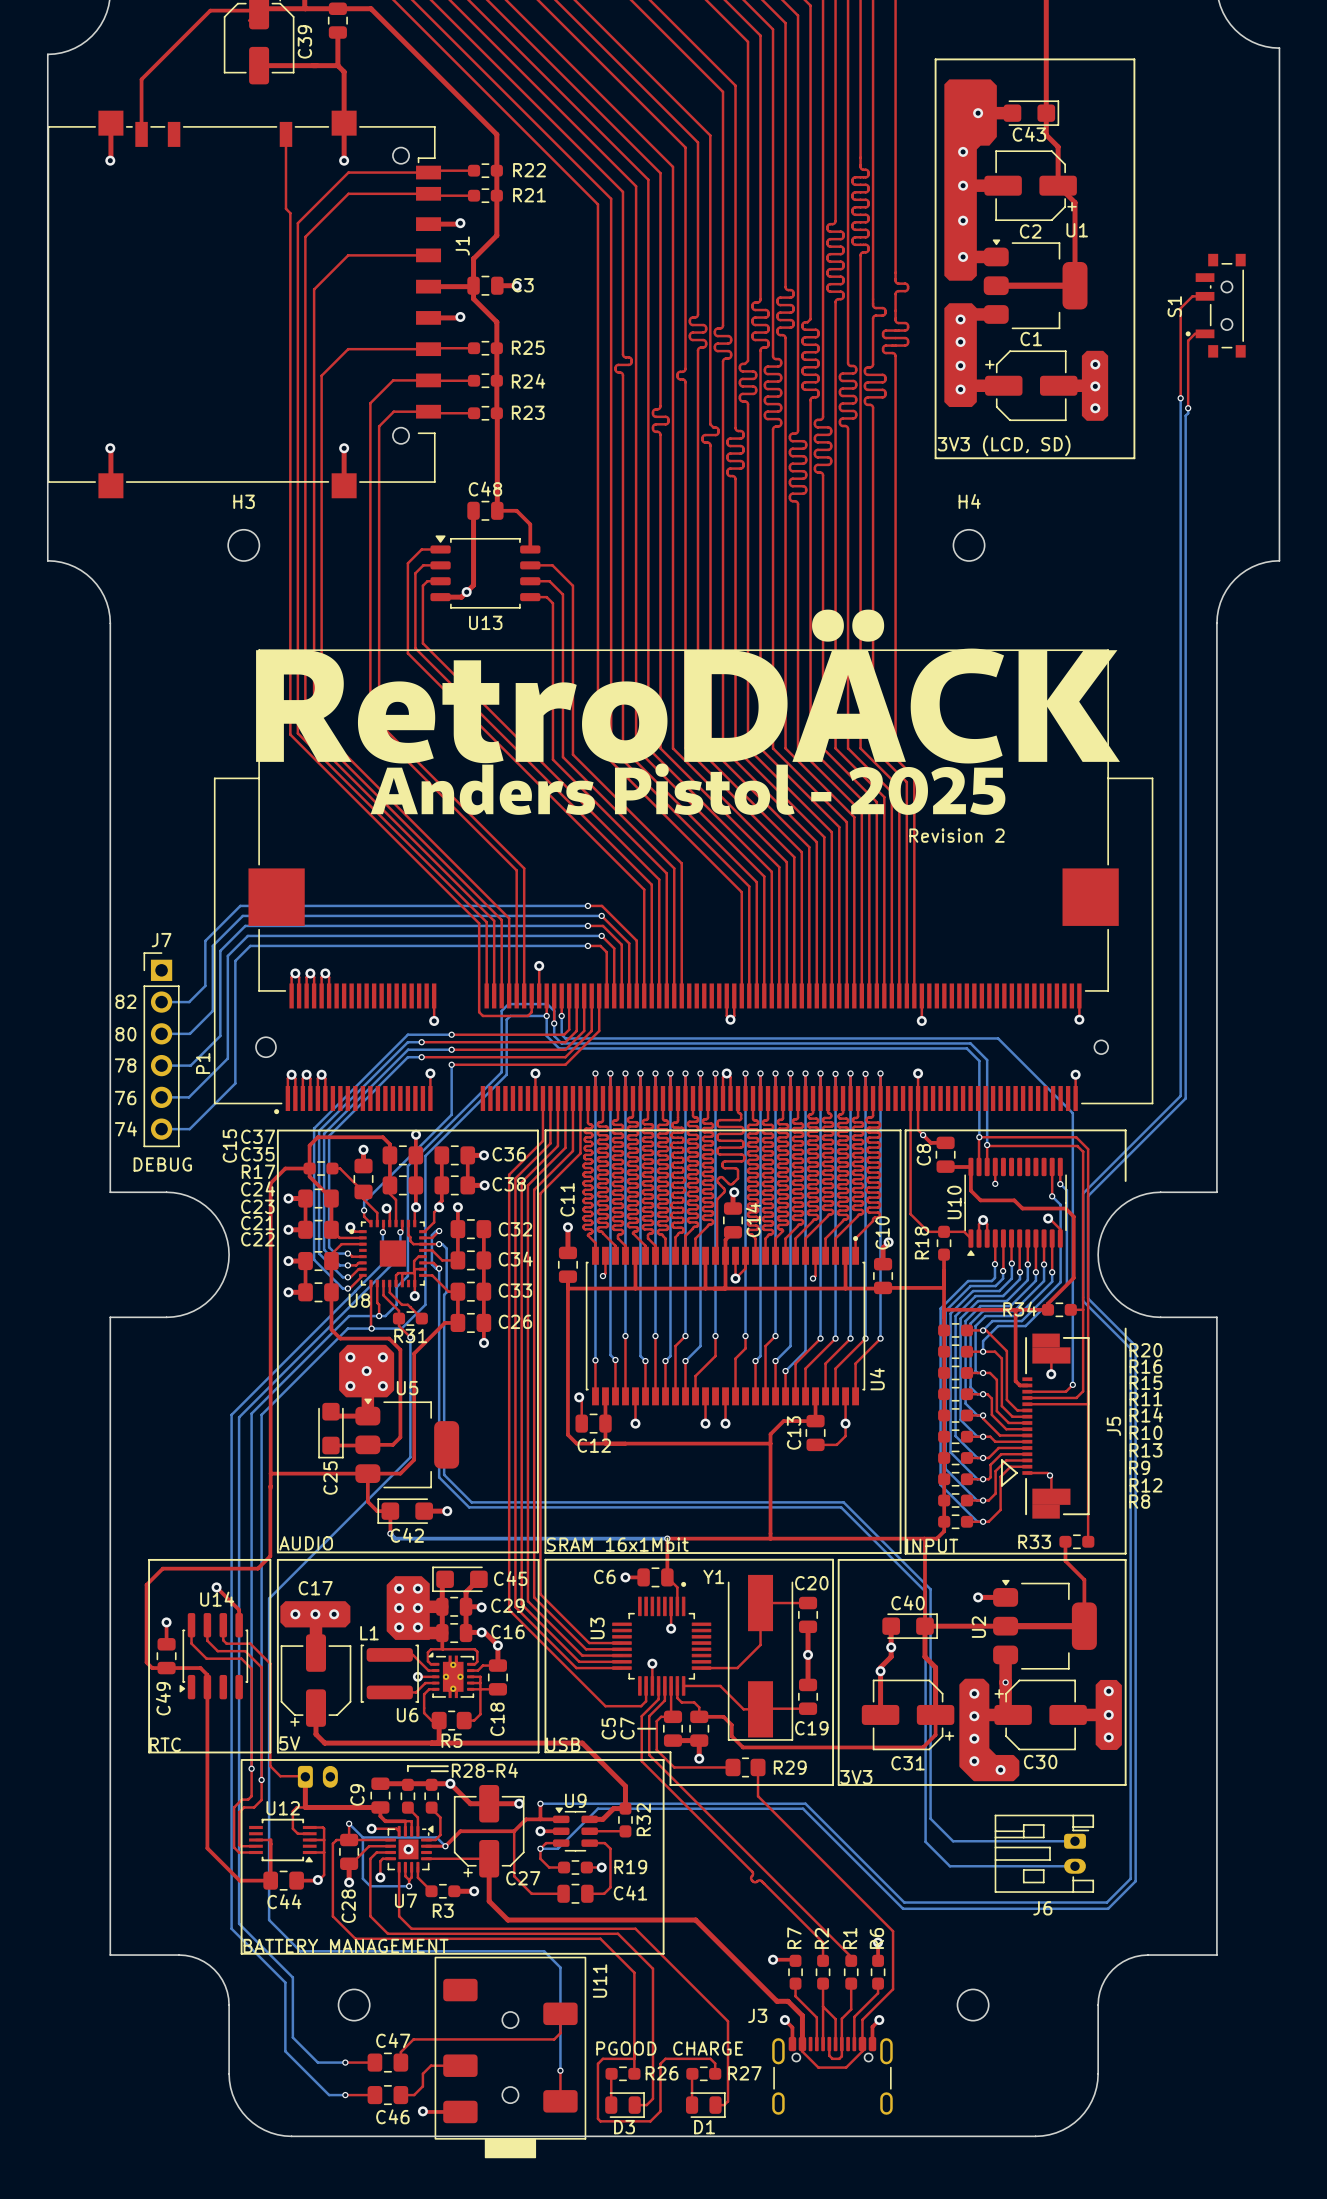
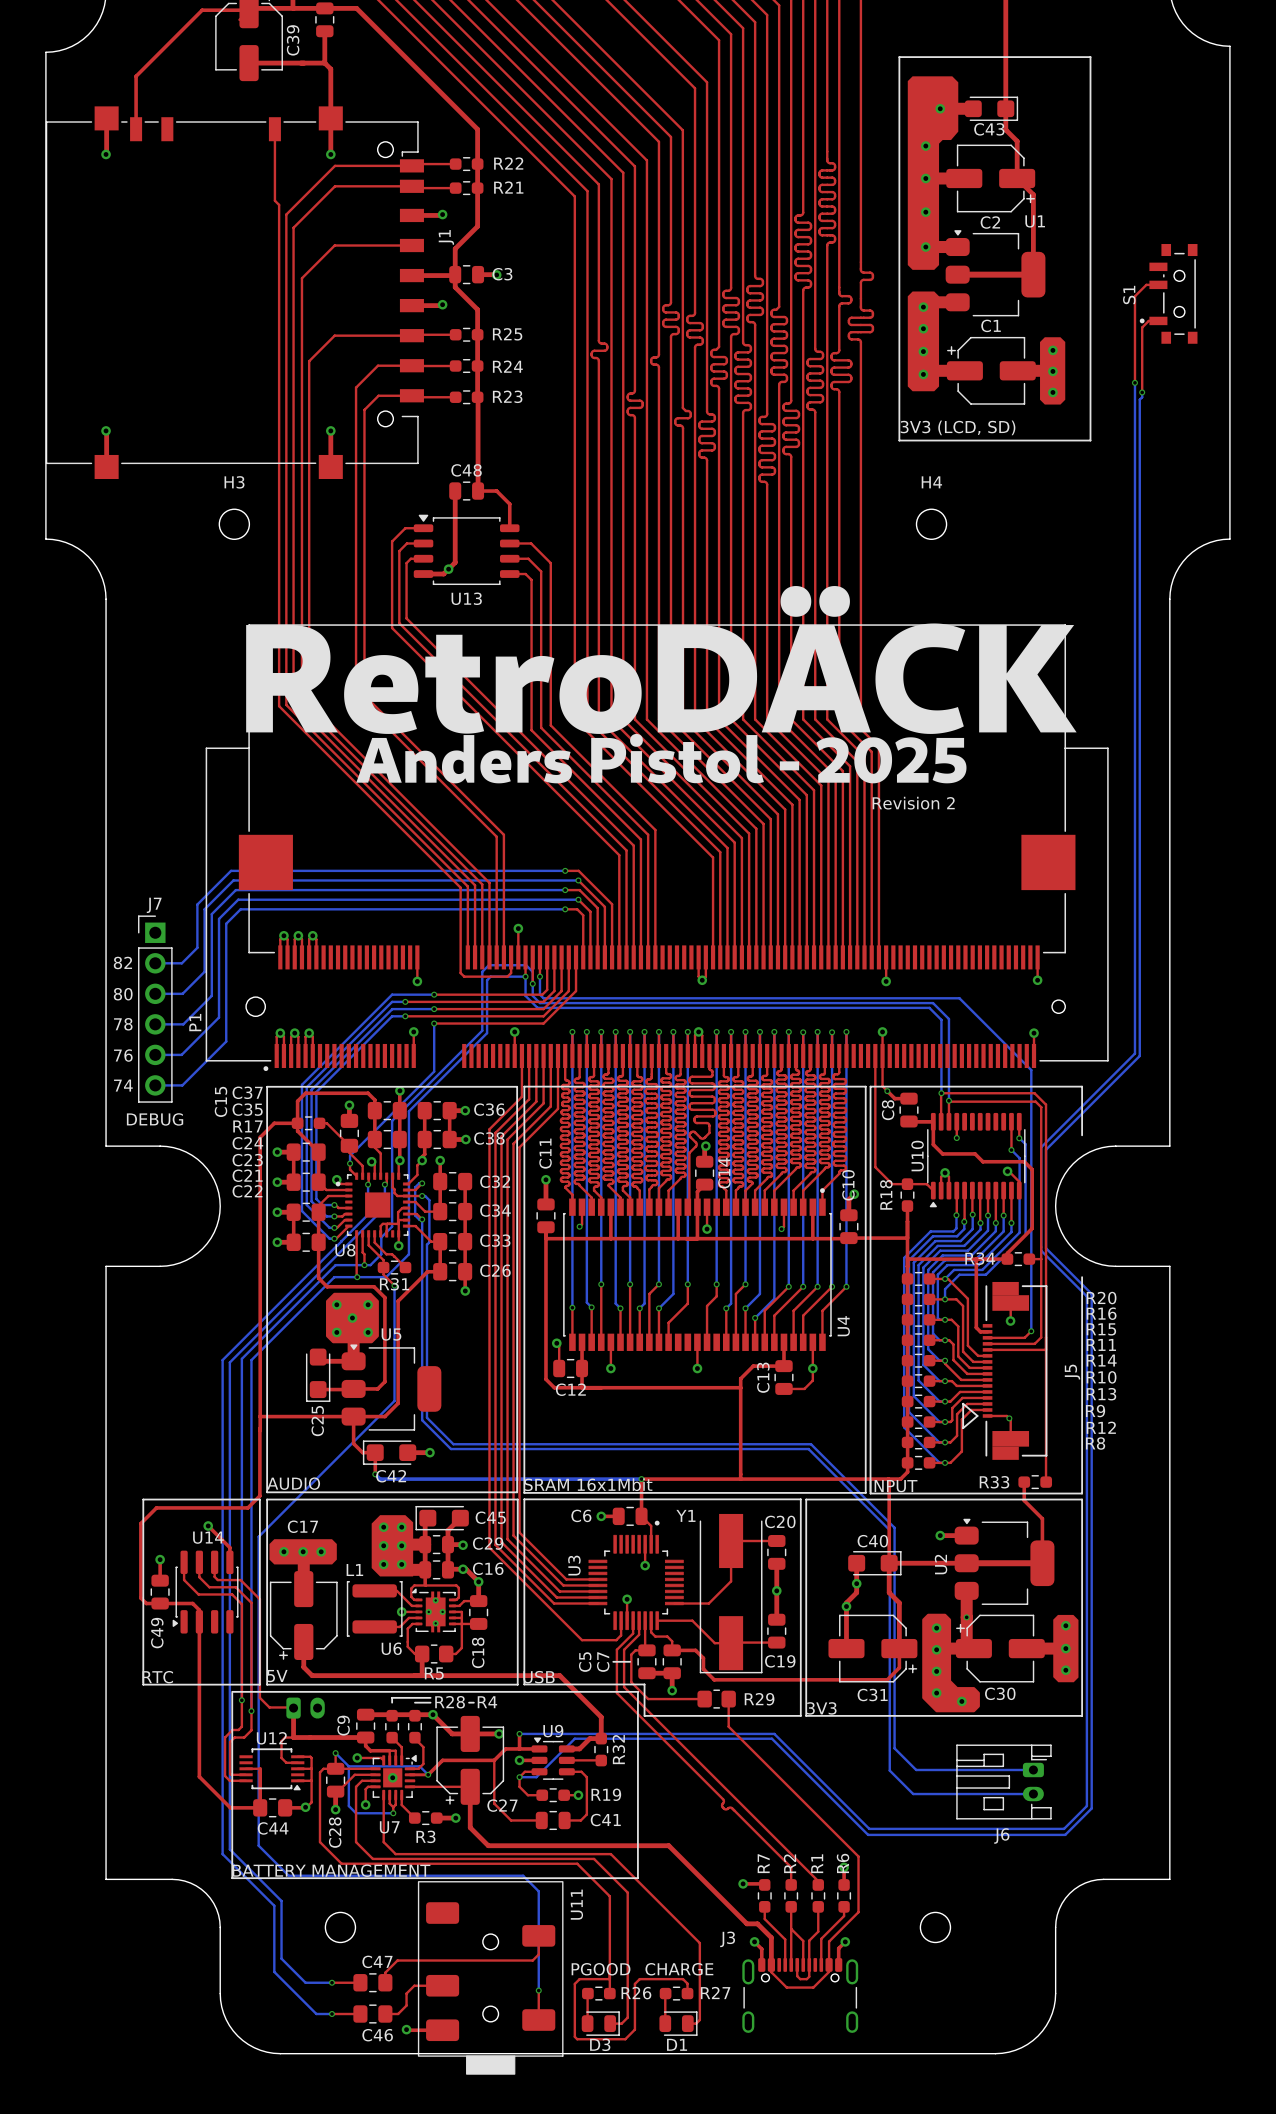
top track: (745, 1255) (745, 1268) (735, 1278) -> none
top track: (705, 1396) (705, 1423) -> none
via: (705, 1423) -> none

